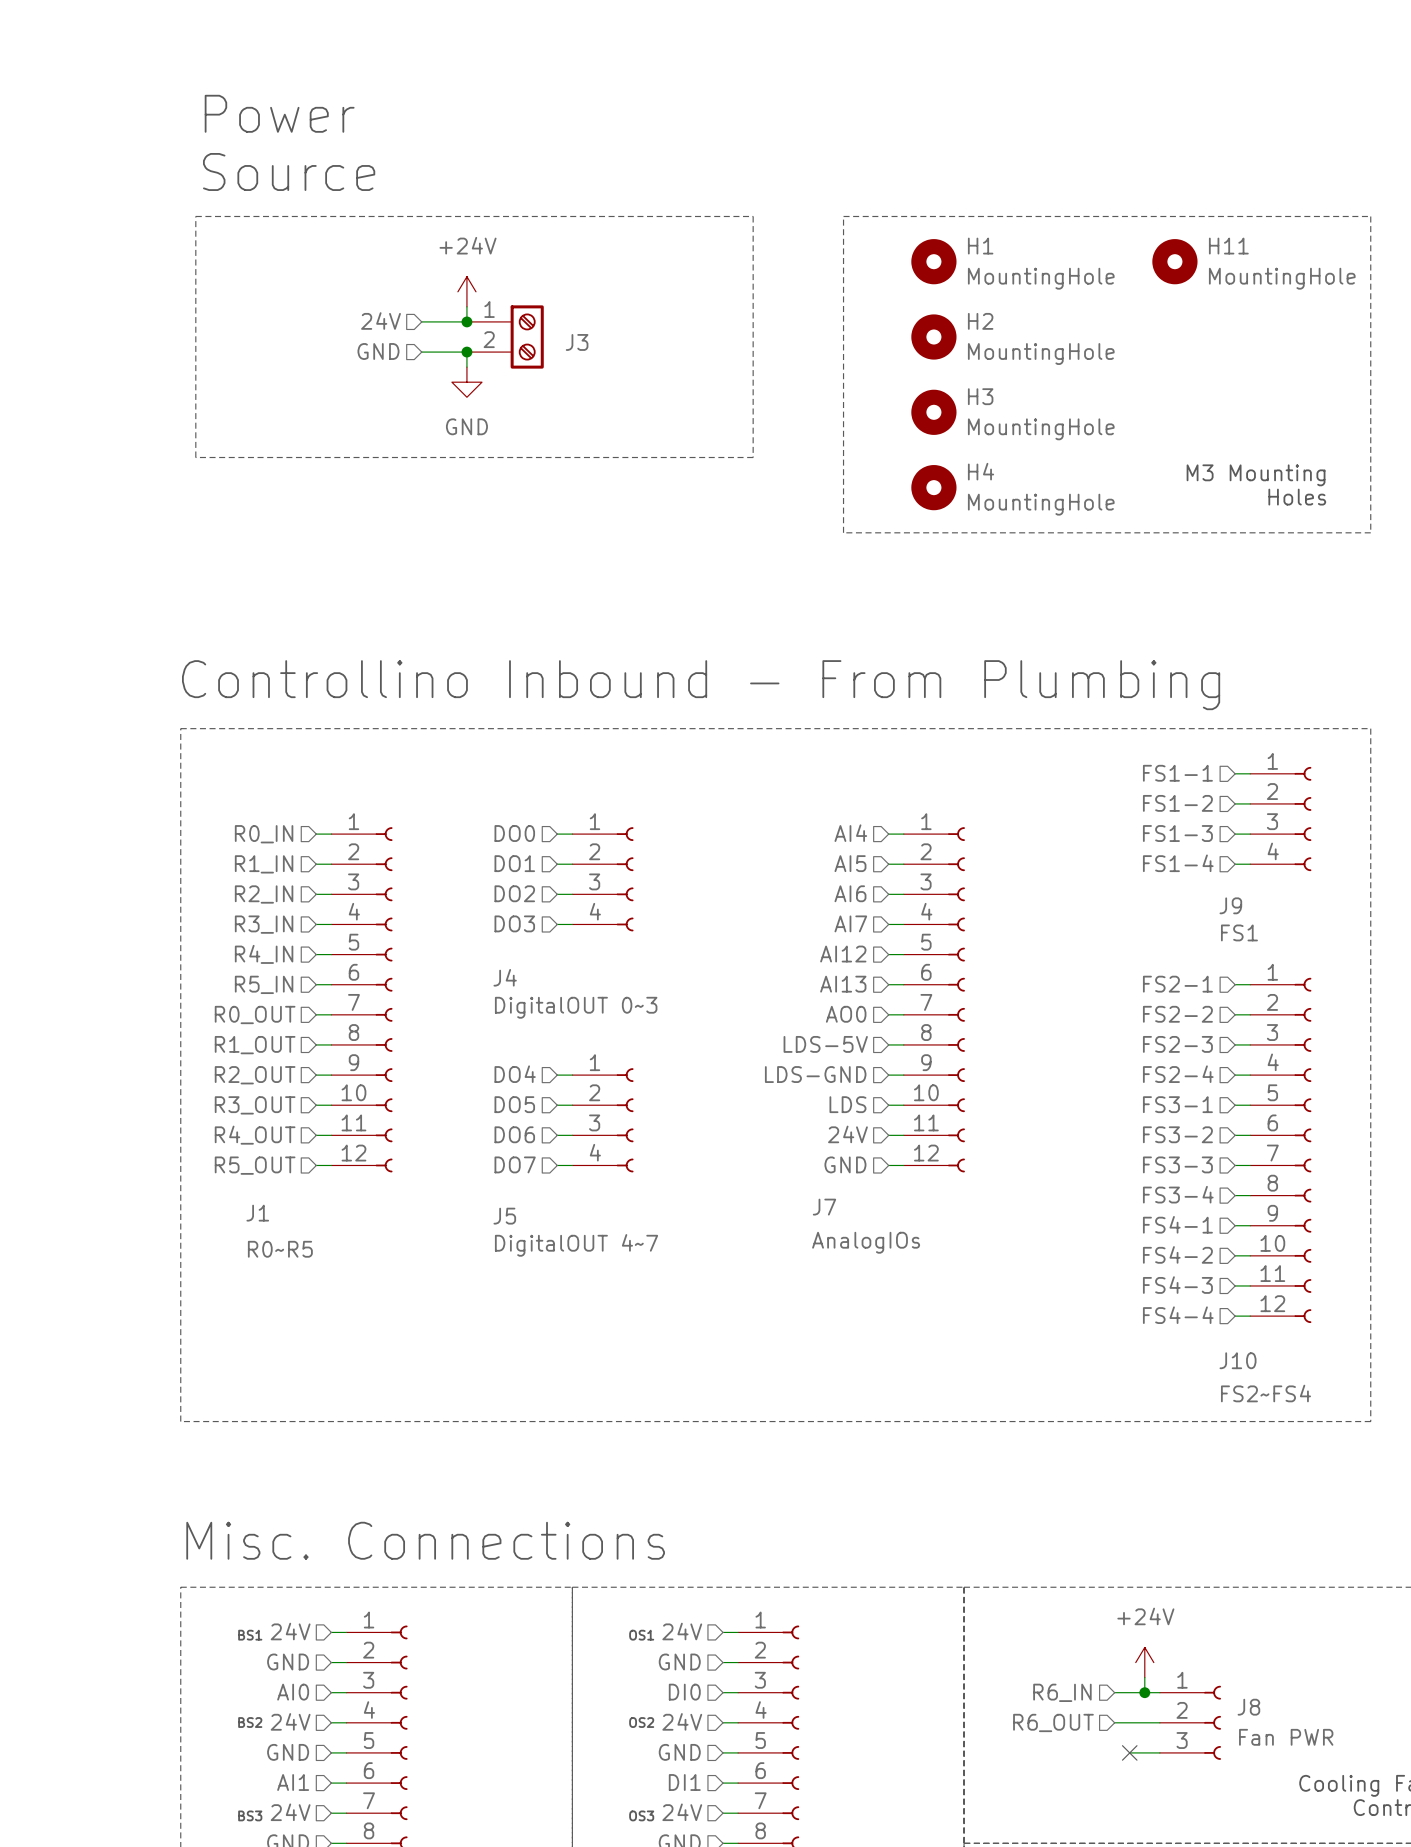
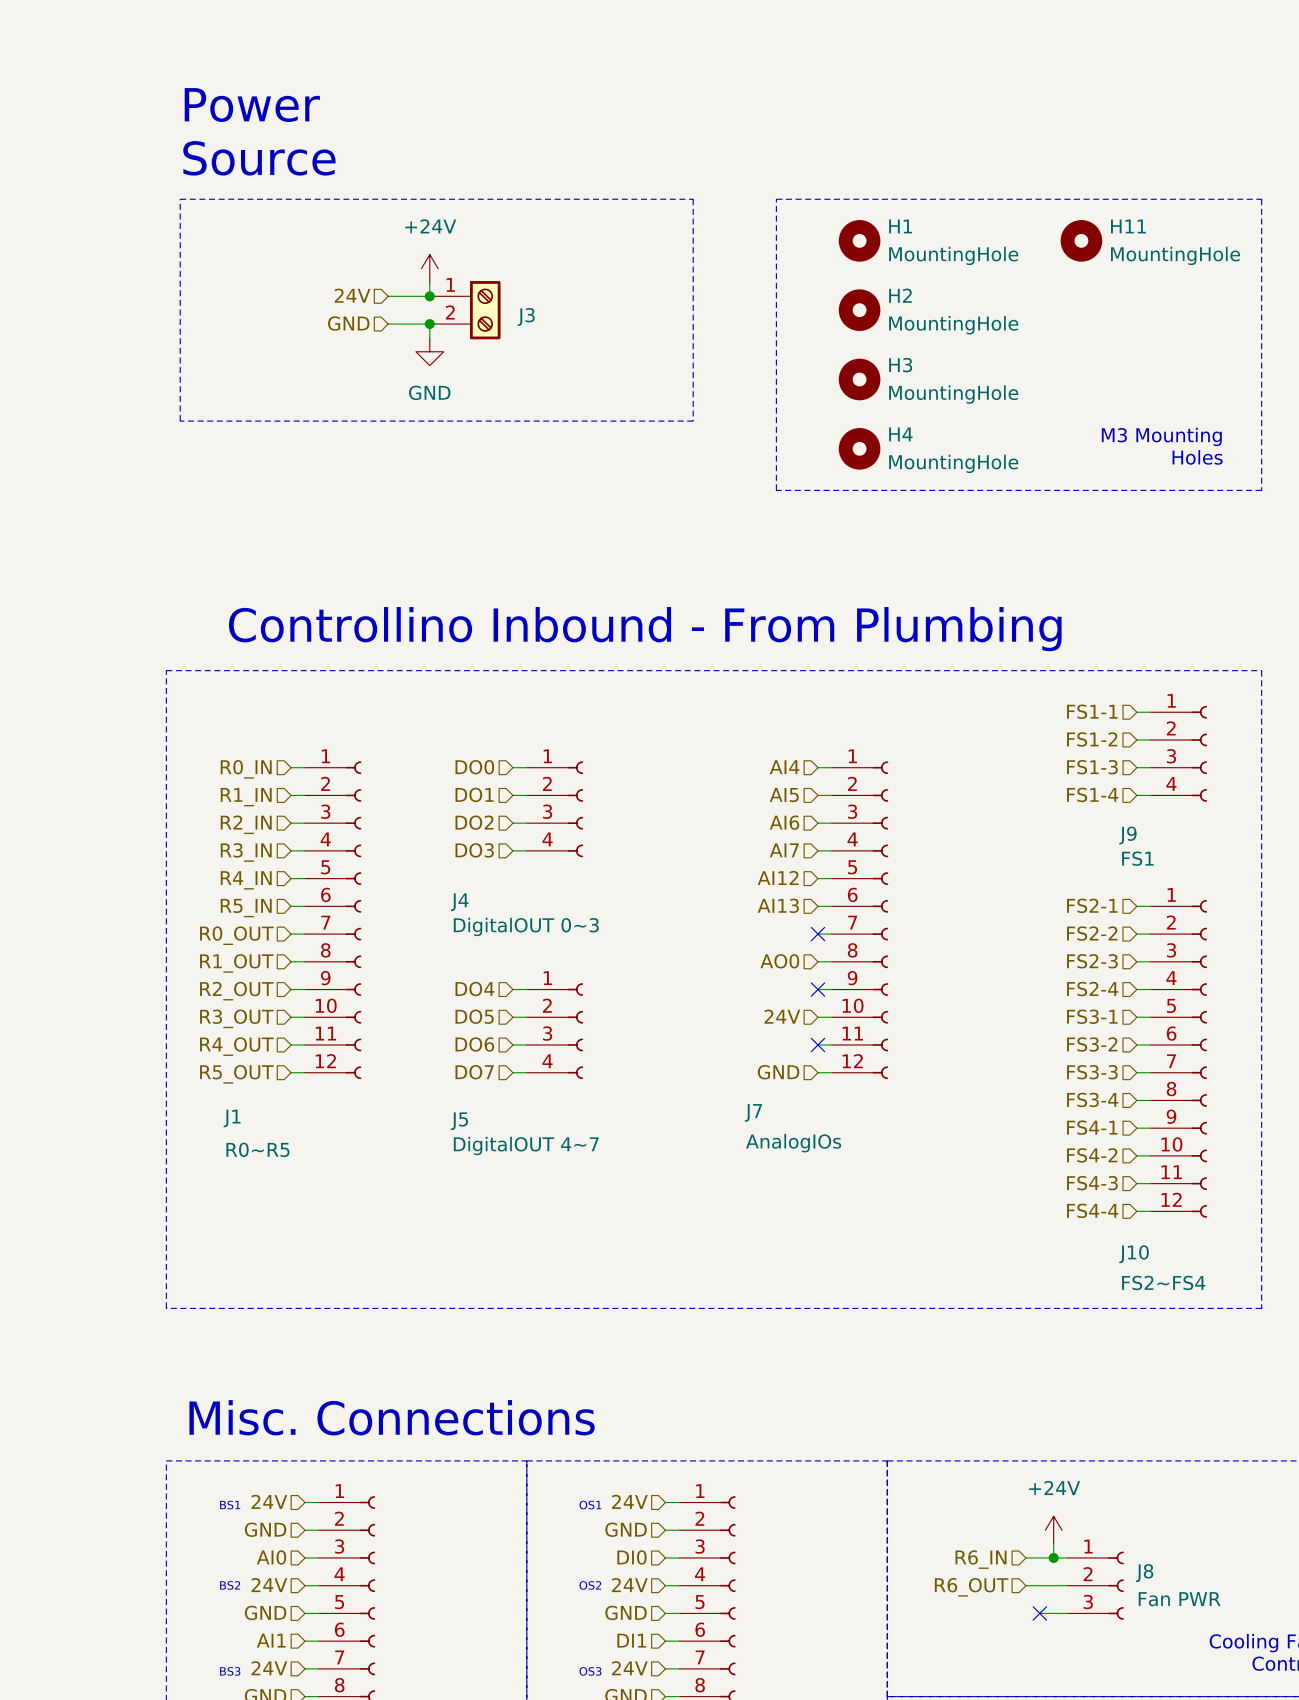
hierarchical label: AO0 (846, 1014) -> none
no-connect mark: none -> (817, 934)
hierarchical label: LDS-5V (825, 1044) -> AO0 (779, 961)
hierarchical label: LDS-GND (815, 1074) -> none
no-connect mark: none -> (817, 989)
hierarchical label: LDS (847, 1104) -> 24V (782, 1016)
hierarchical label: 24V (847, 1134) -> none
no-connect mark: none -> (817, 1044)

